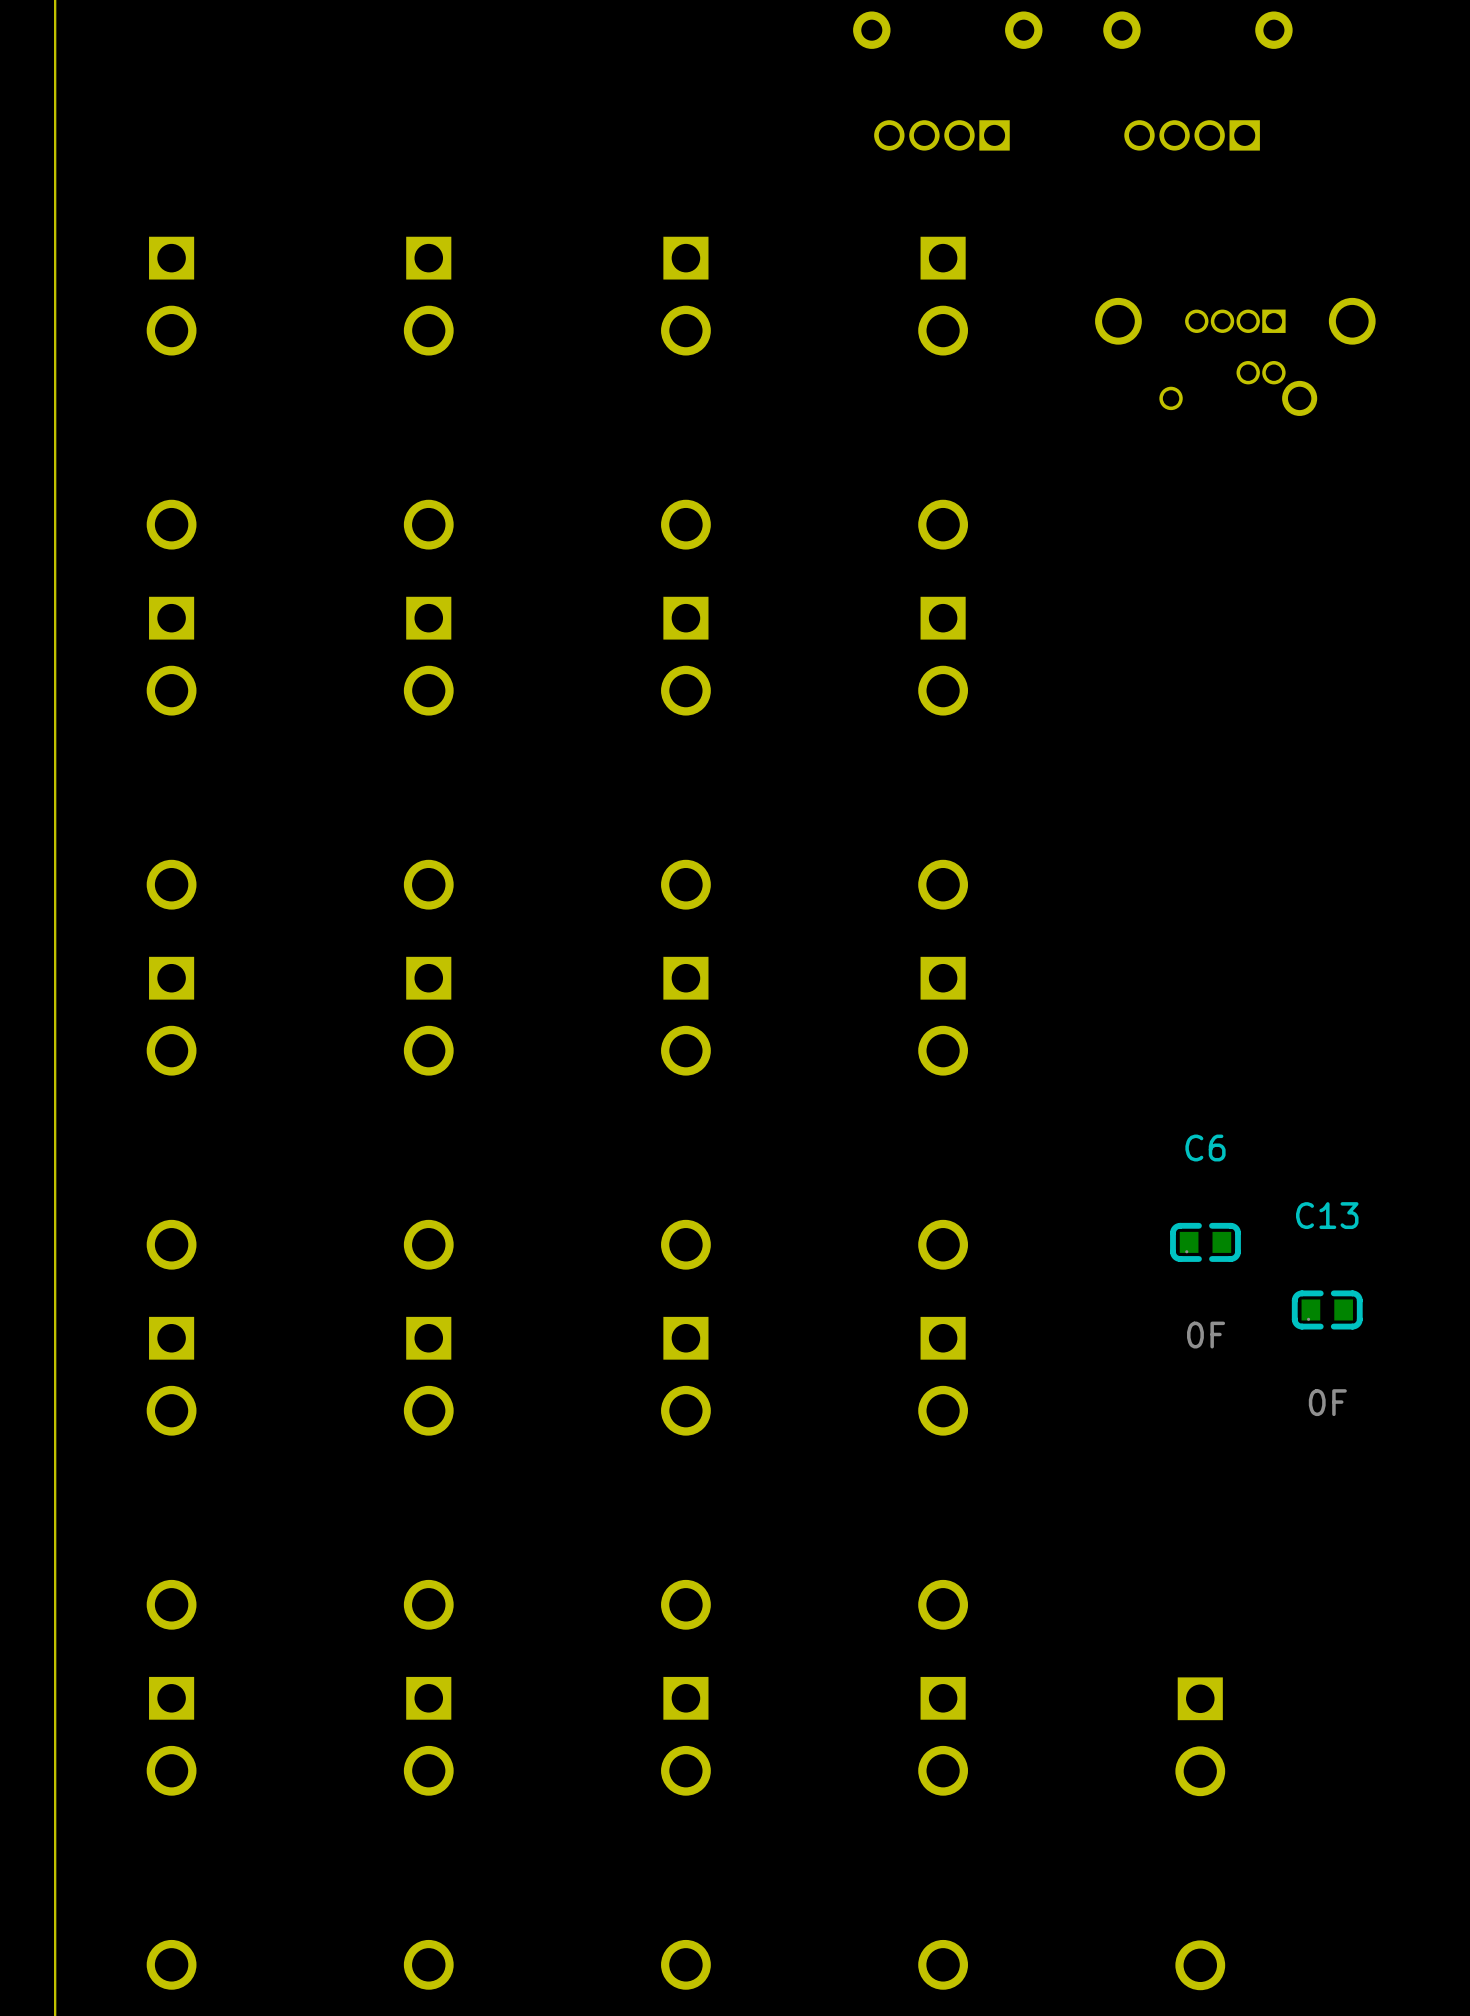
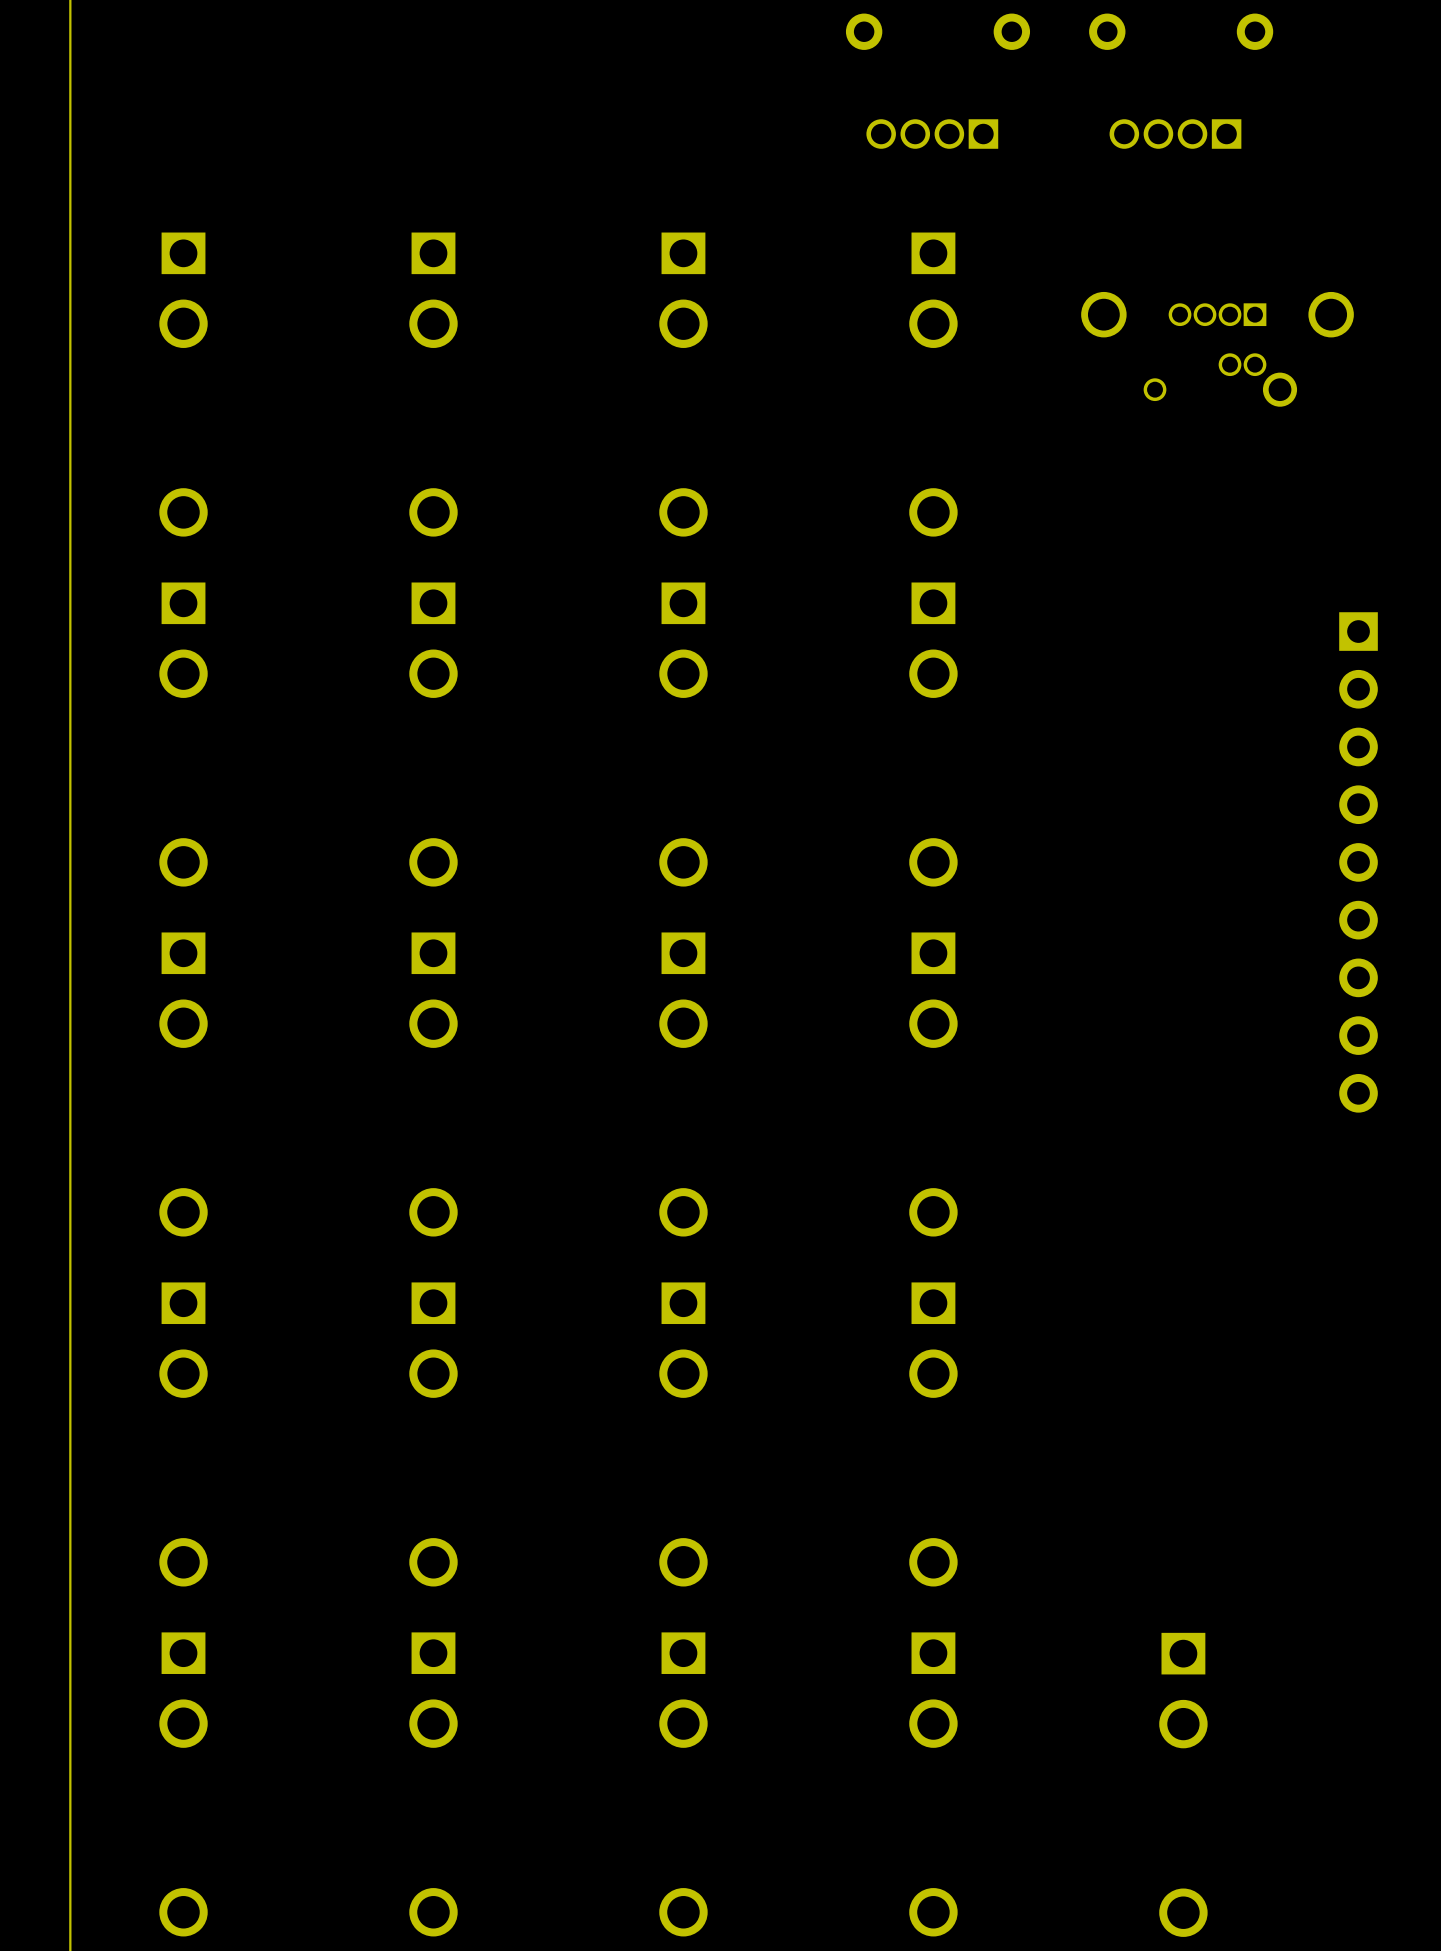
part: none -> (1358, 862)
C6: 0F (1205, 1242) -> none
C13: 0F (1327, 1309) -> none

